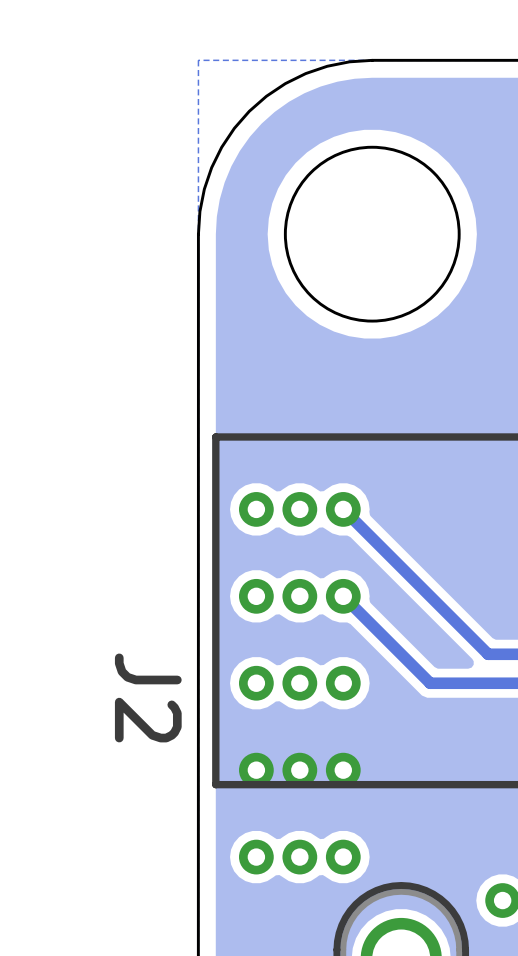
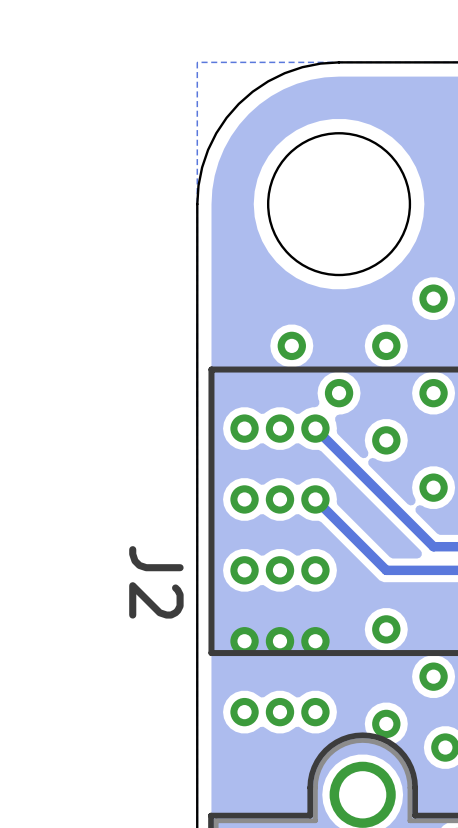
via: none -> (433, 298)
via: none -> (291, 345)
via: none -> (386, 345)
via: none -> (339, 393)
via: none -> (433, 393)
via: none -> (386, 440)
via: none -> (433, 487)
via: none -> (386, 629)
via: none -> (433, 676)
via: none -> (386, 723)

